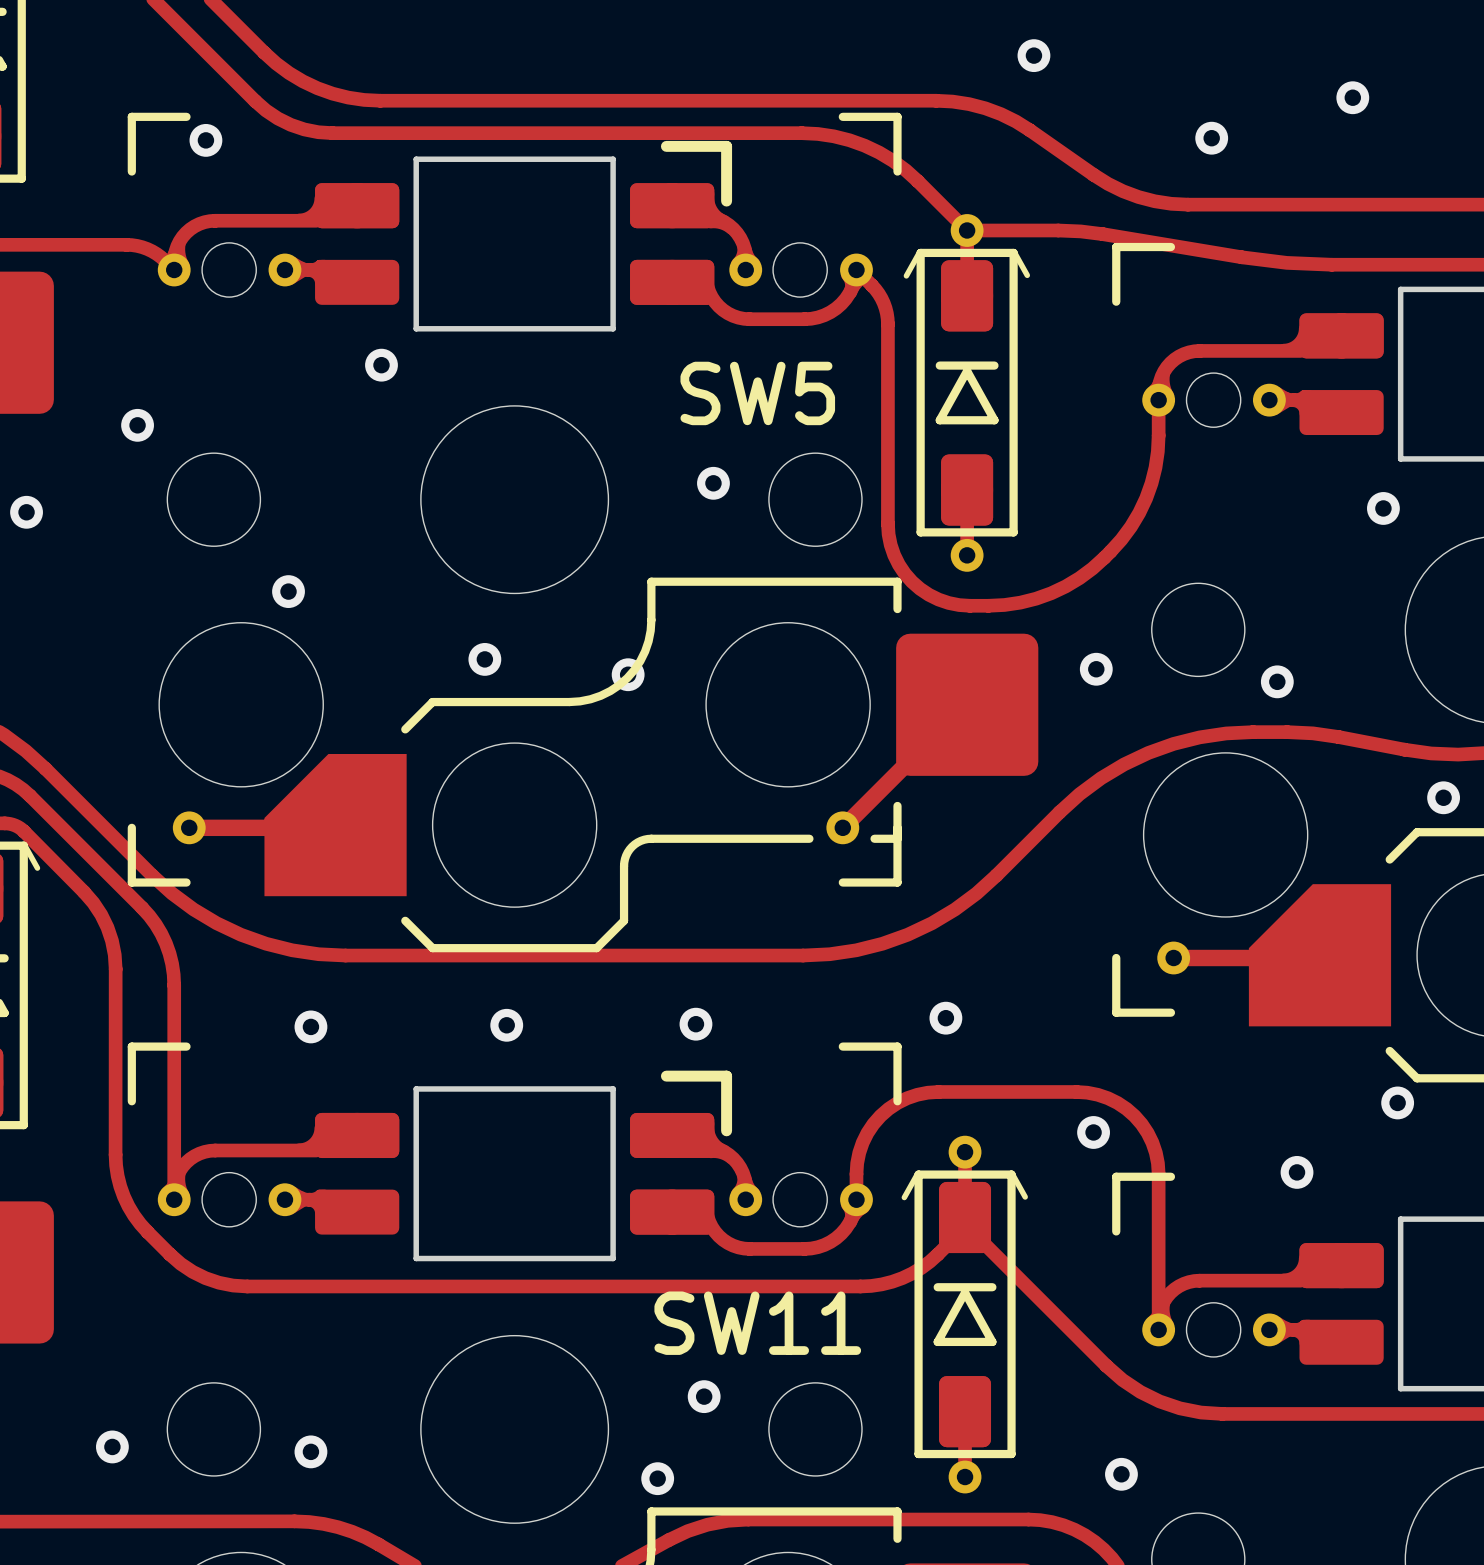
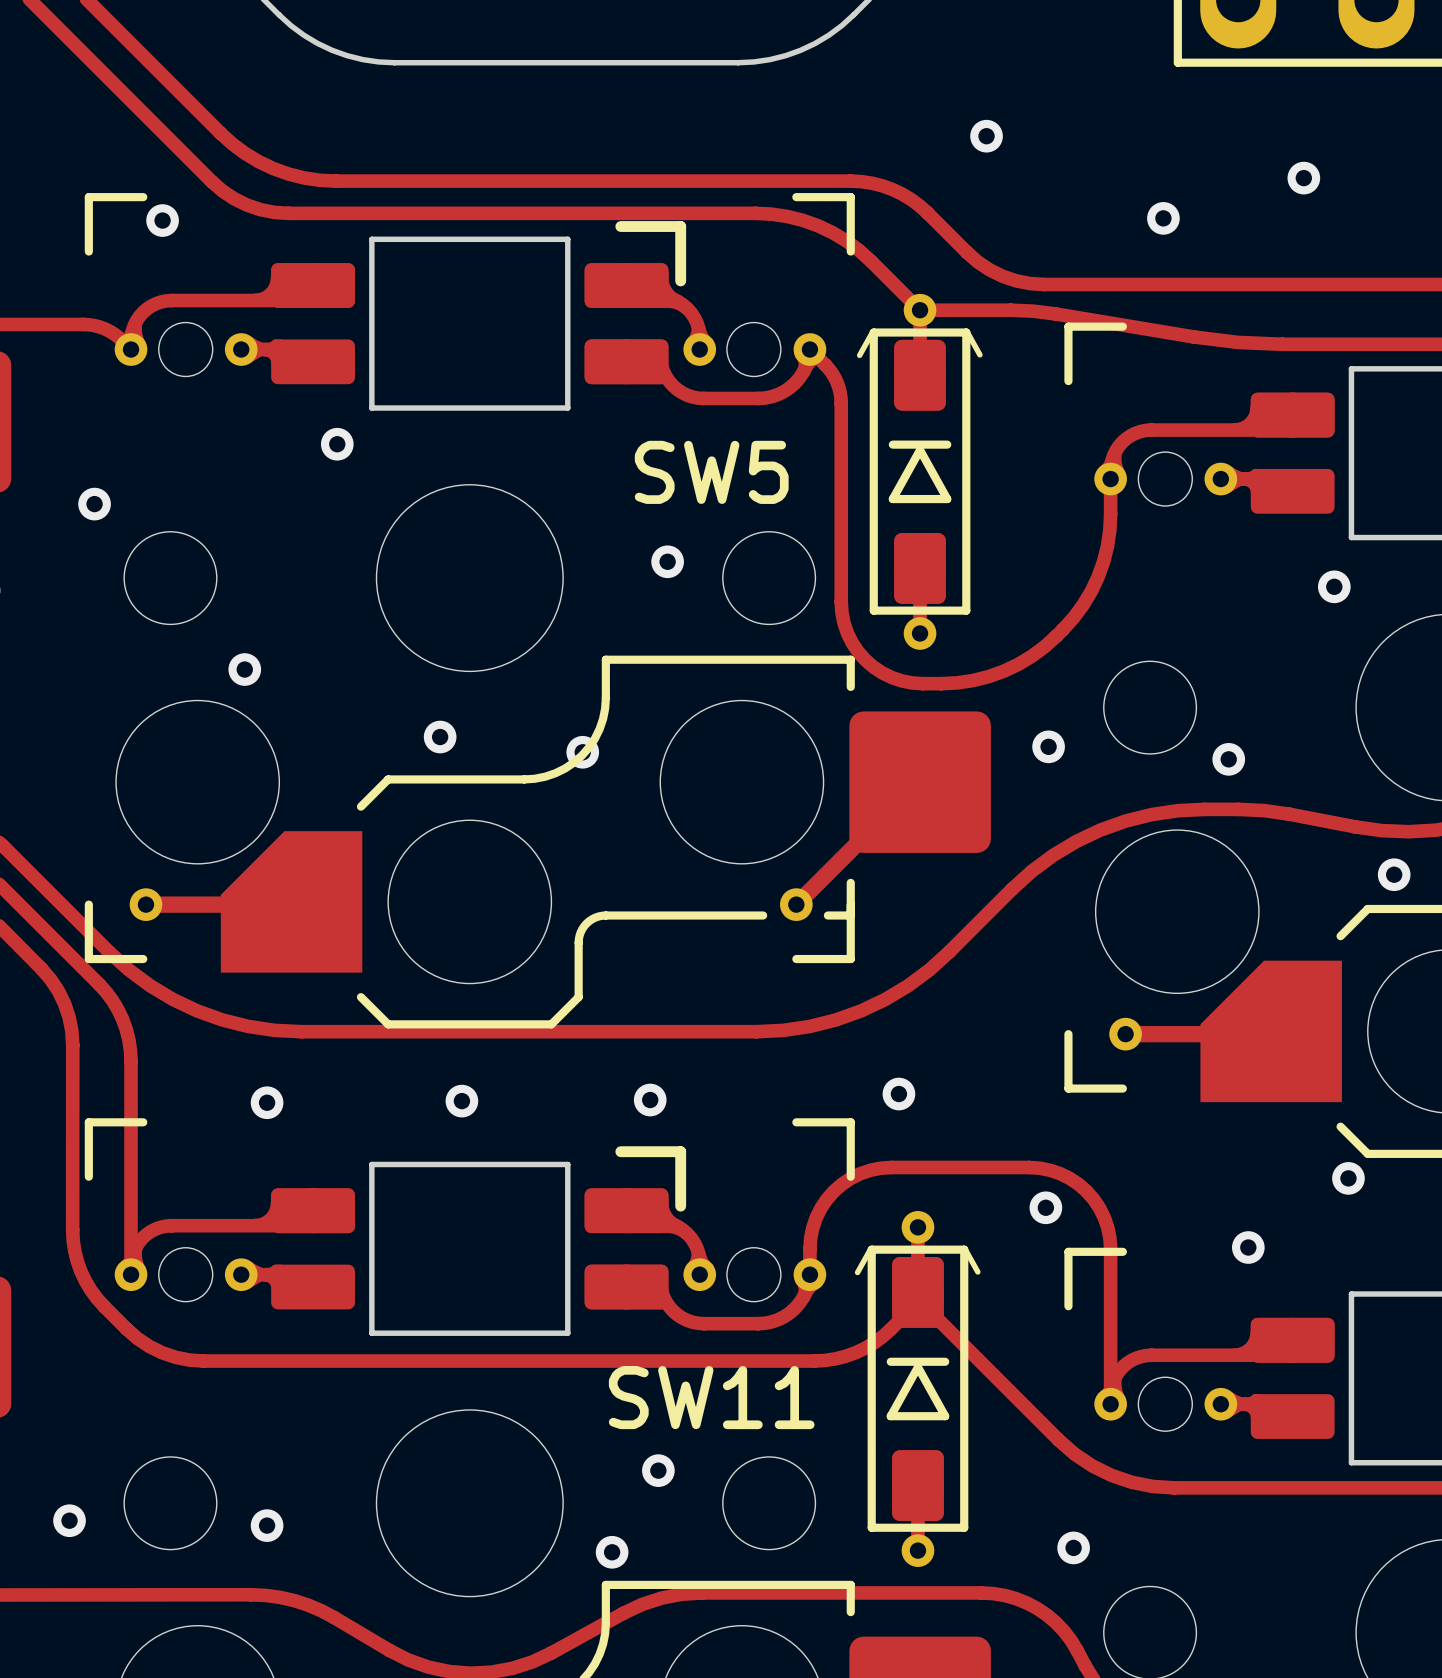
track: (897, 100) (952, 101) (985, 108) (1015, 121) (1093, 175) (1122, 191) (1154, 201) (1187, 204) -> (850, 181) (882, 185) (911, 199) (977, 262) (1002, 276) (1015, 280) (1044, 284) (1139, 284)

